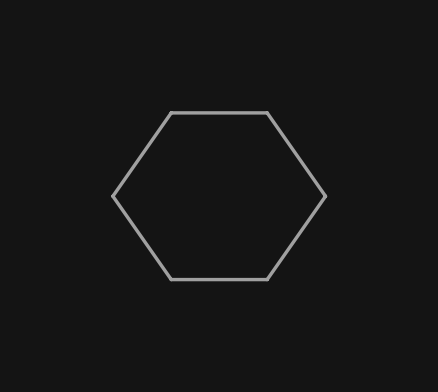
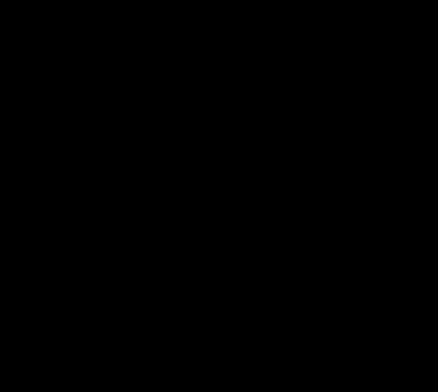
board edge: (171, 112) (112, 196) (171, 279) (267, 279) (325, 196) (267, 112) (171, 112) -> none

